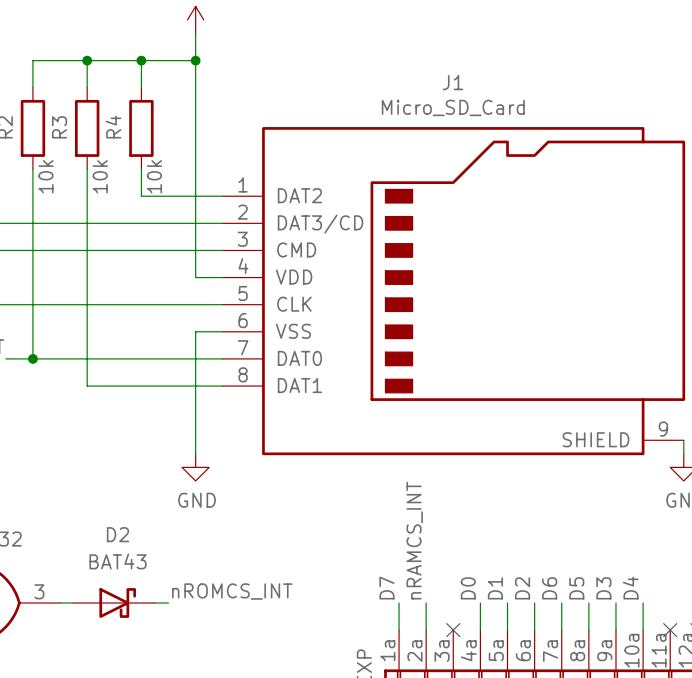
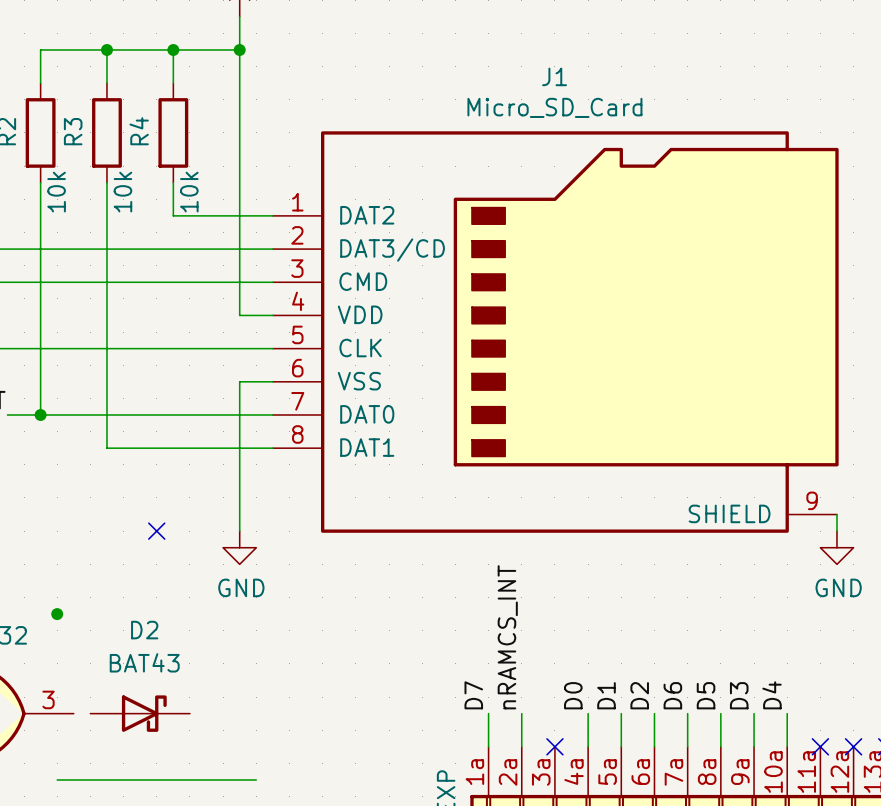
no-connect mark: none -> (156, 531)
junction: none -> (57, 614)
label: nROMCS_INT (232, 591) -> none
wire: (60, 602) (73, 602) -> none
wire: (154, 602) (168, 602) -> none
wire: none -> (57, 779) (256, 779)

